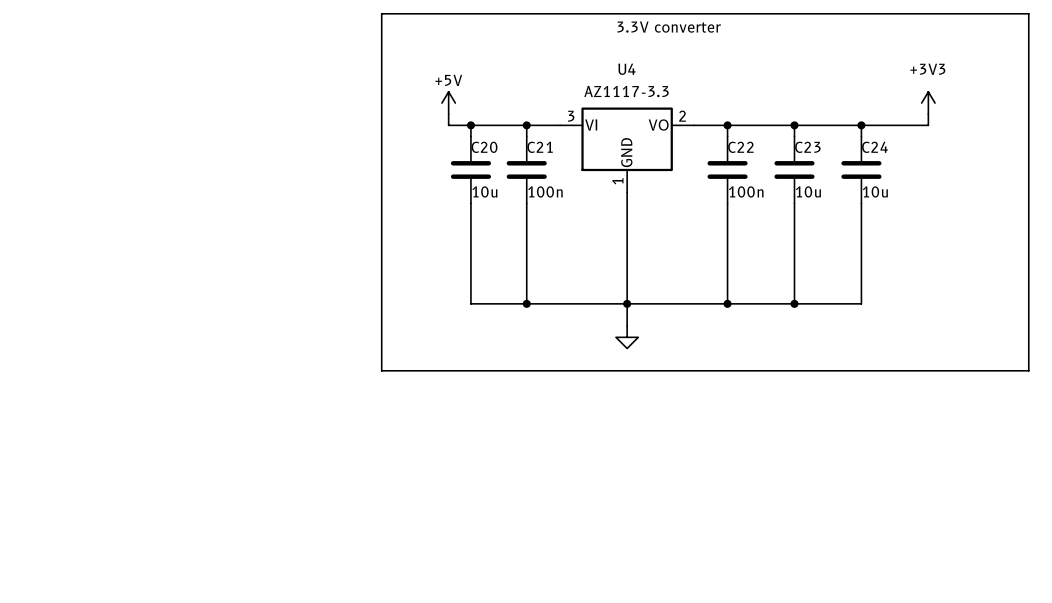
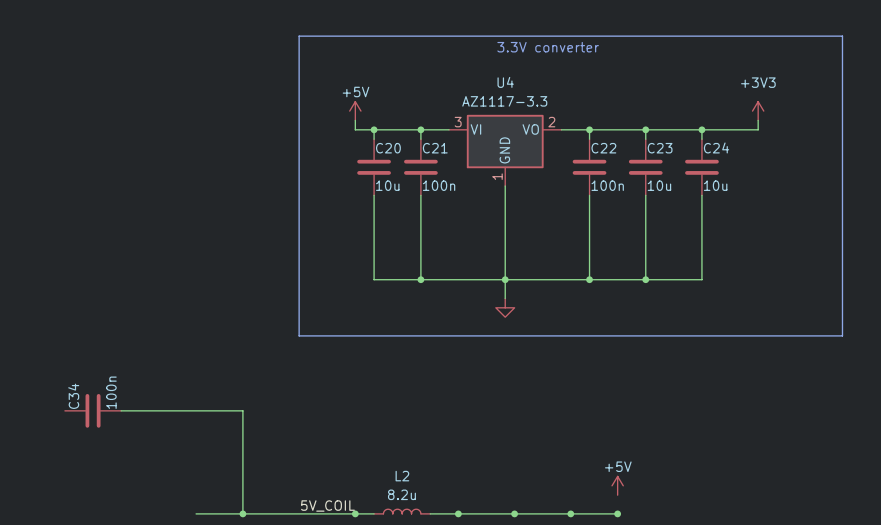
C34: none -> 100n (93, 410)
wire: none -> (121, 410) (242, 410) (242, 513)
power symbol: none -> +5V (617, 485)
label: none -> 5V_COIL (327, 506)
L2: none -> 8.2u (402, 511)
wire: none -> (196, 513) (374, 513)
junction: none -> (242, 513)
junction: none -> (355, 513)
wire: none -> (430, 513) (617, 513)
junction: none -> (458, 513)
junction: none -> (514, 513)
junction: none -> (570, 513)
junction: none -> (617, 513)

